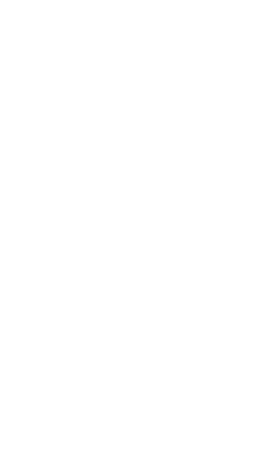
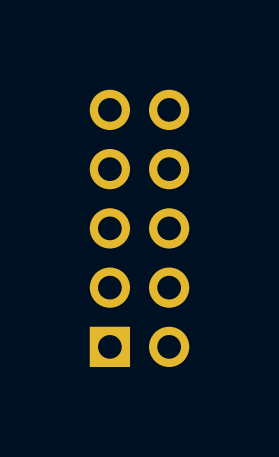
part: none -> (139, 228)

